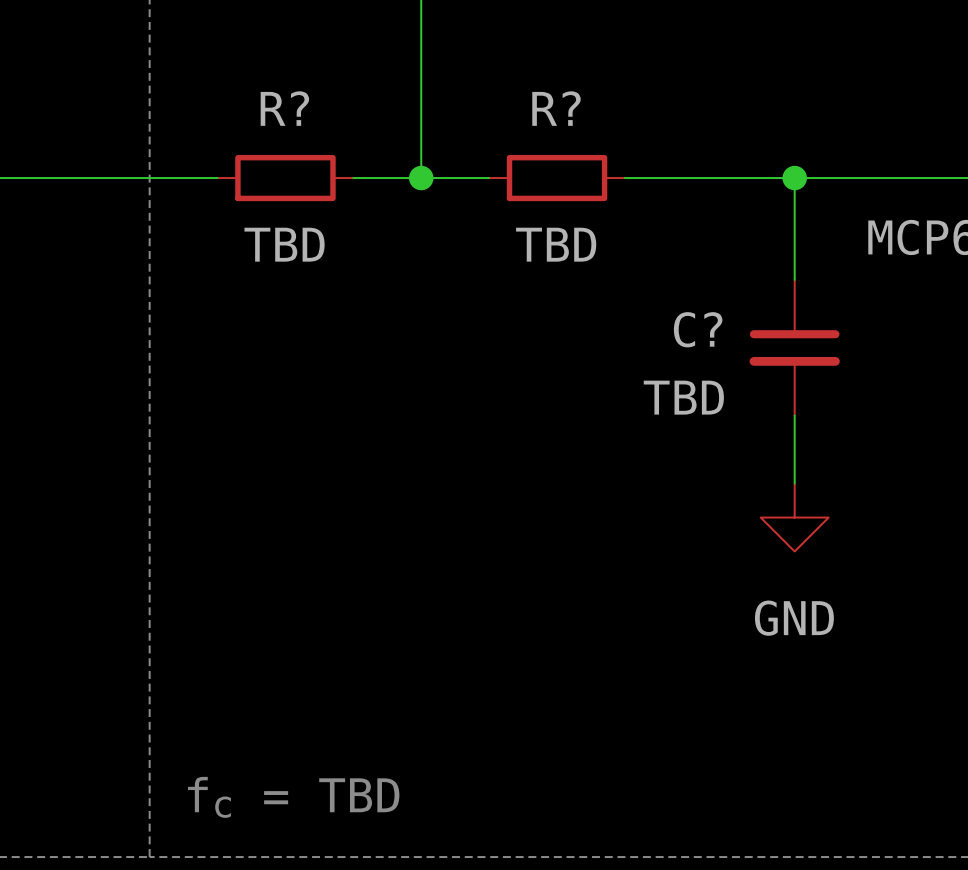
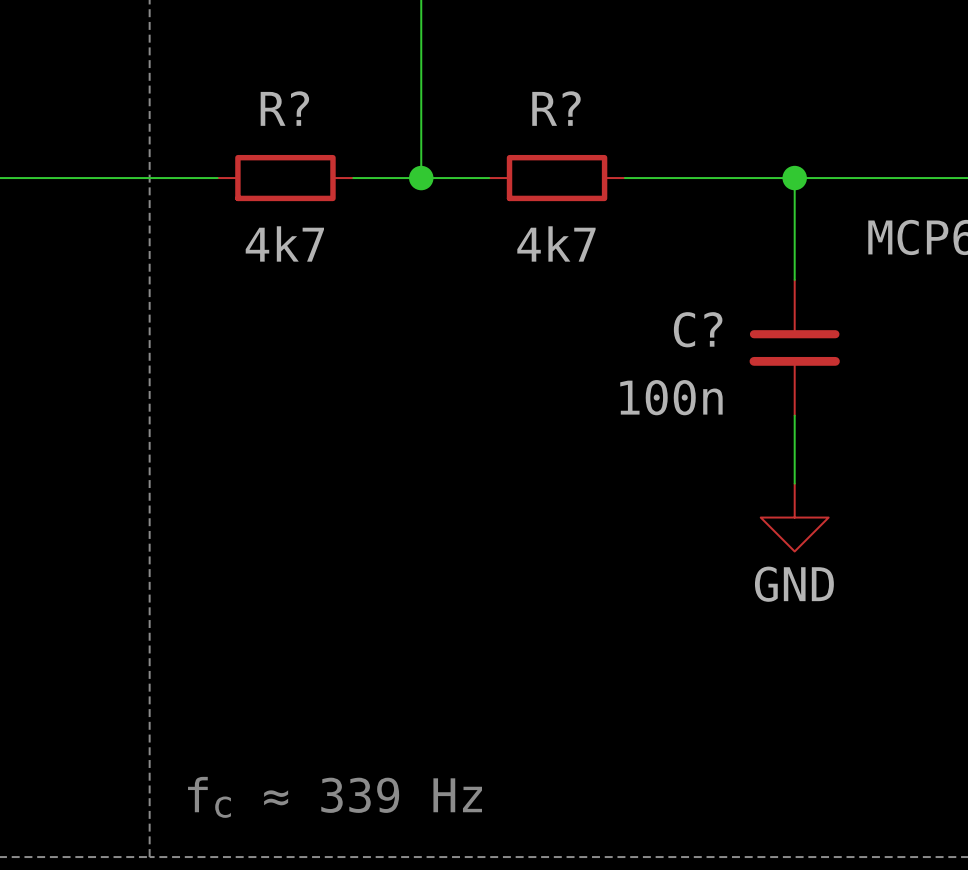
R? value: TBD (284, 244) -> 4k7 (284, 243)
R? value: TBD (556, 244) -> 4k7 (556, 243)
C? value: TBD (683, 397) -> 100n (671, 397)
power symbol text position: GND (794, 618) -> GND (794, 584)
text: fc = TBD (293, 797) -> fc ≈ 339 Hz (335, 797)

